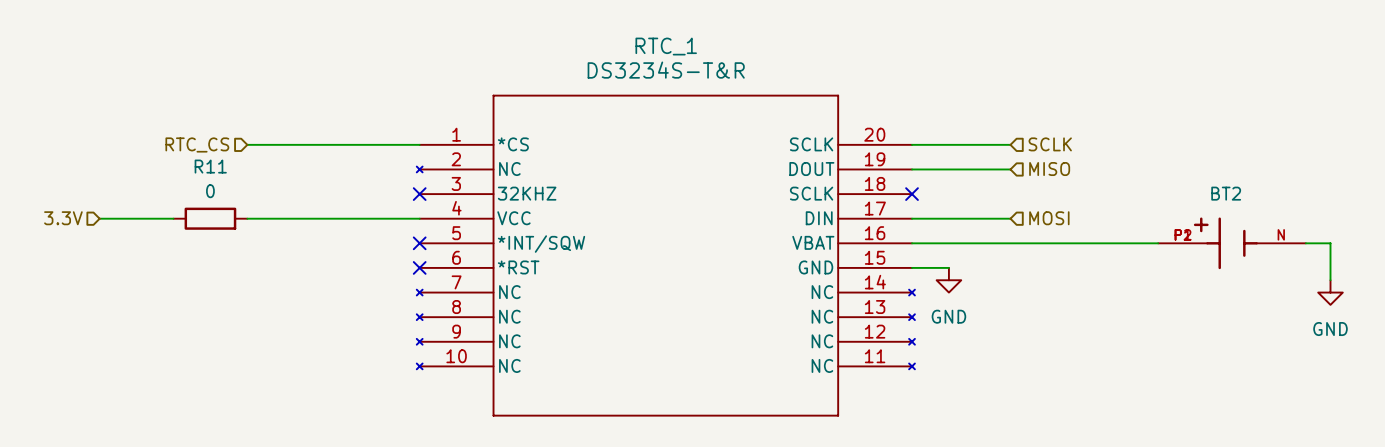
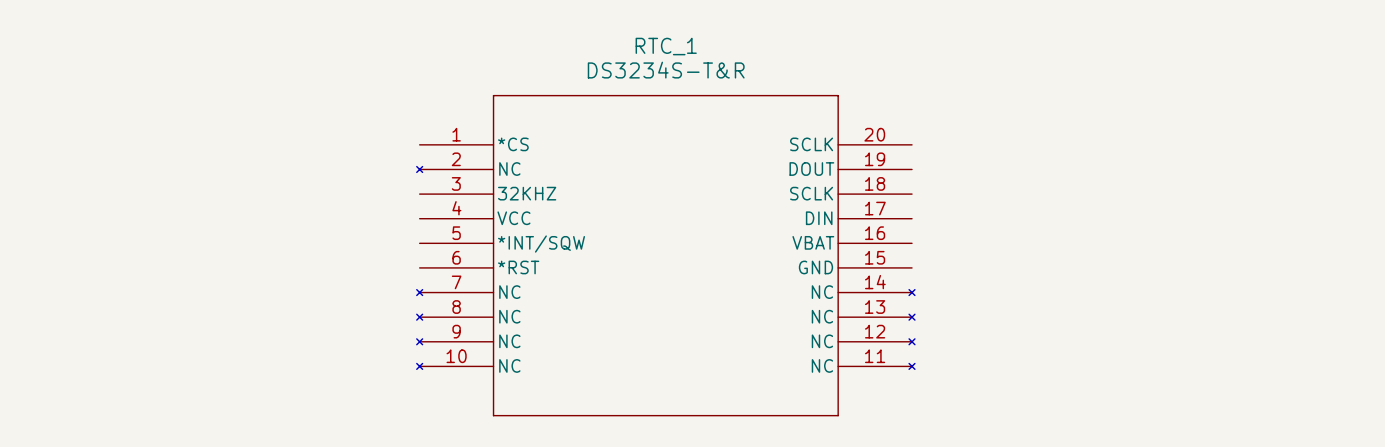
hierarchical label: RTC_CS (197, 144) -> none
wire: (247, 144) (419, 144) -> none
wire: (912, 144) (1010, 144) -> none
hierarchical label: SCLK (1050, 144) -> none
wire: (912, 169) (1010, 169) -> none
hierarchical label: MISO (1049, 169) -> none
no-connect mark: (419, 194) -> none
no-connect mark: (912, 194) -> none
hierarchical label: 3.3V (63, 218) -> none
wire: (99, 218) (173, 218) -> none
R11: 0 (210, 218) -> none
wire: (247, 218) (419, 218) -> none
wire: (912, 218) (1010, 218) -> none
hierarchical label: MOSI (1049, 218) -> none
no-connect mark: (419, 243) -> none
wire: (912, 243) (1158, 243) -> none
BT2: (1232, 243) -> none
wire: (1305, 243) (1330, 243) (1330, 280) -> none
no-connect mark: (419, 267) -> none
wire: (912, 267) (948, 267) -> none
power symbol: GND (948, 280) -> none
power symbol: GND (1330, 292) -> none

